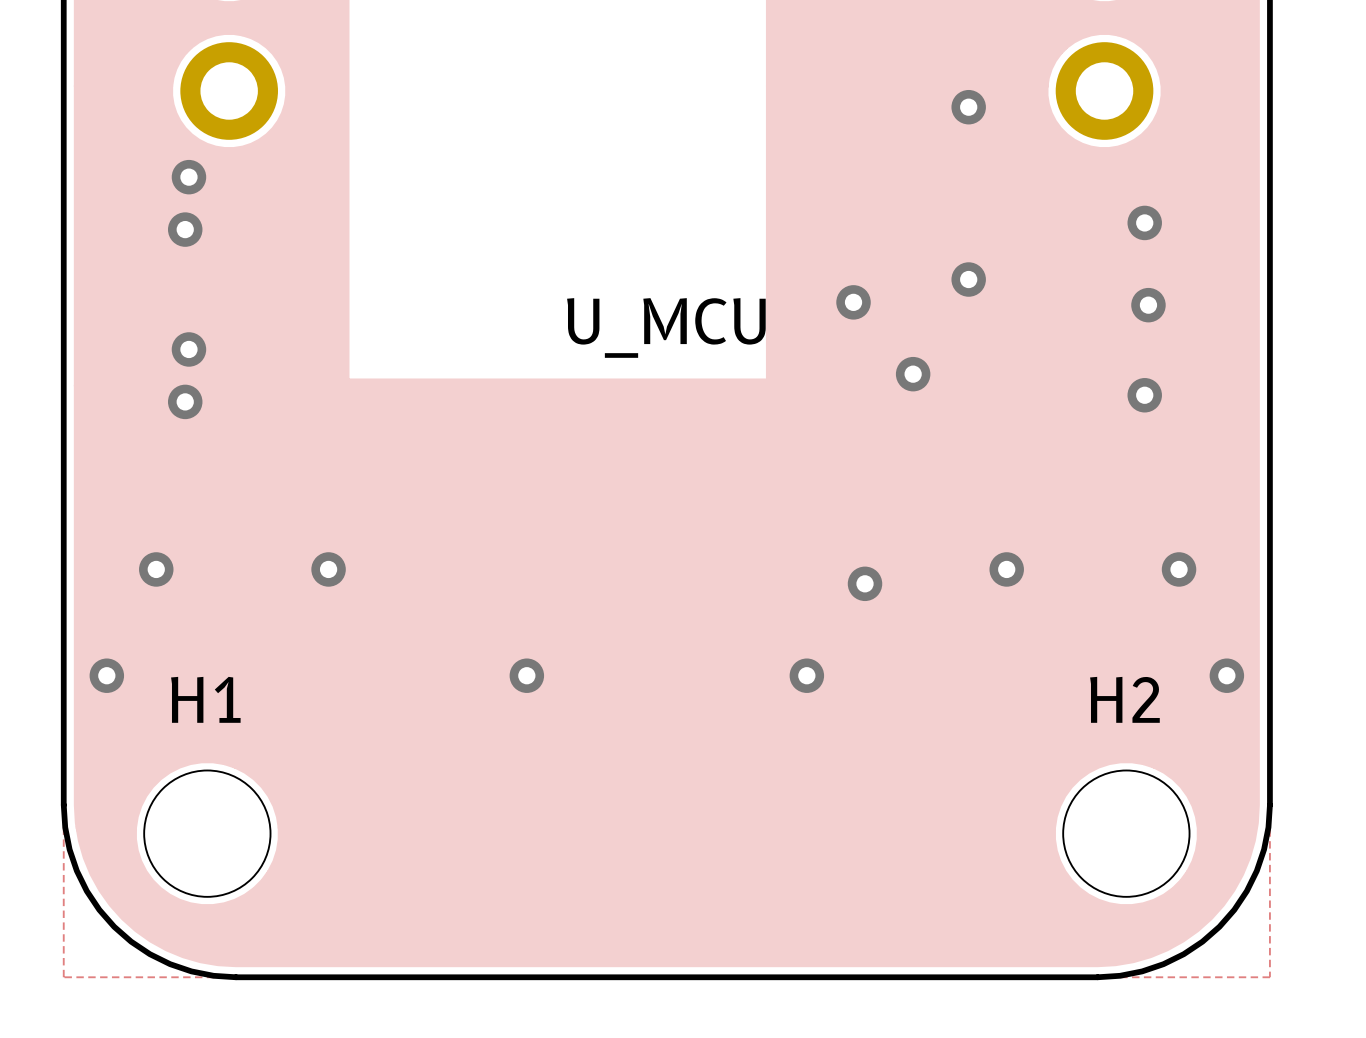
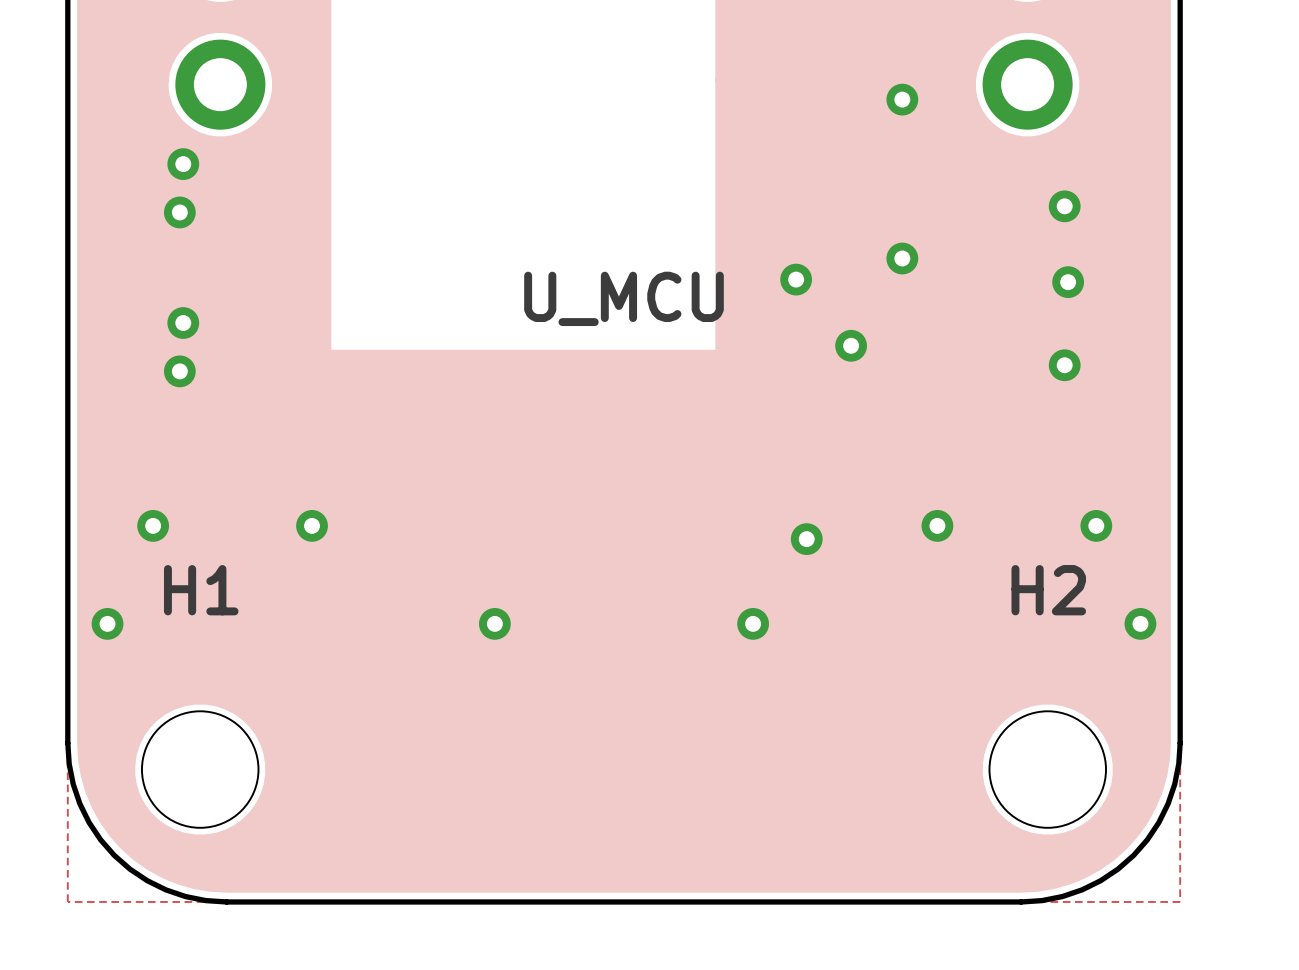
H1 name position: H1 (205, 699) -> H1 (201, 590)
H2 name position: H2 (1124, 699) -> H2 (1048, 590)

